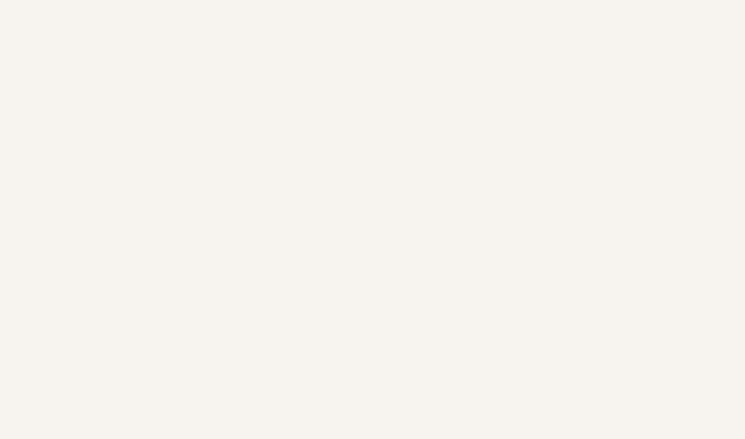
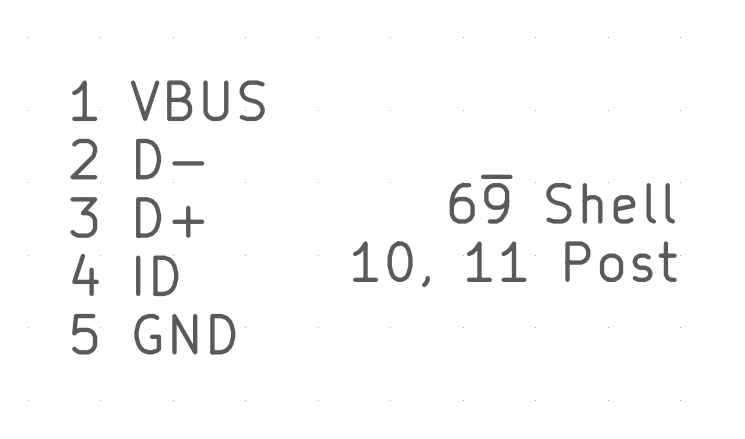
text: none -> 1 VBUS (168, 100)
text: none -> 2 D- (137, 159)
text: none -> 6~{9} Shell (562, 199)
text: none -> 3 D+ (137, 217)
text: none -> 10, 11 Post (514, 264)
text: none -> 4 ID (125, 274)
text: none -> 5 GND (153, 334)

